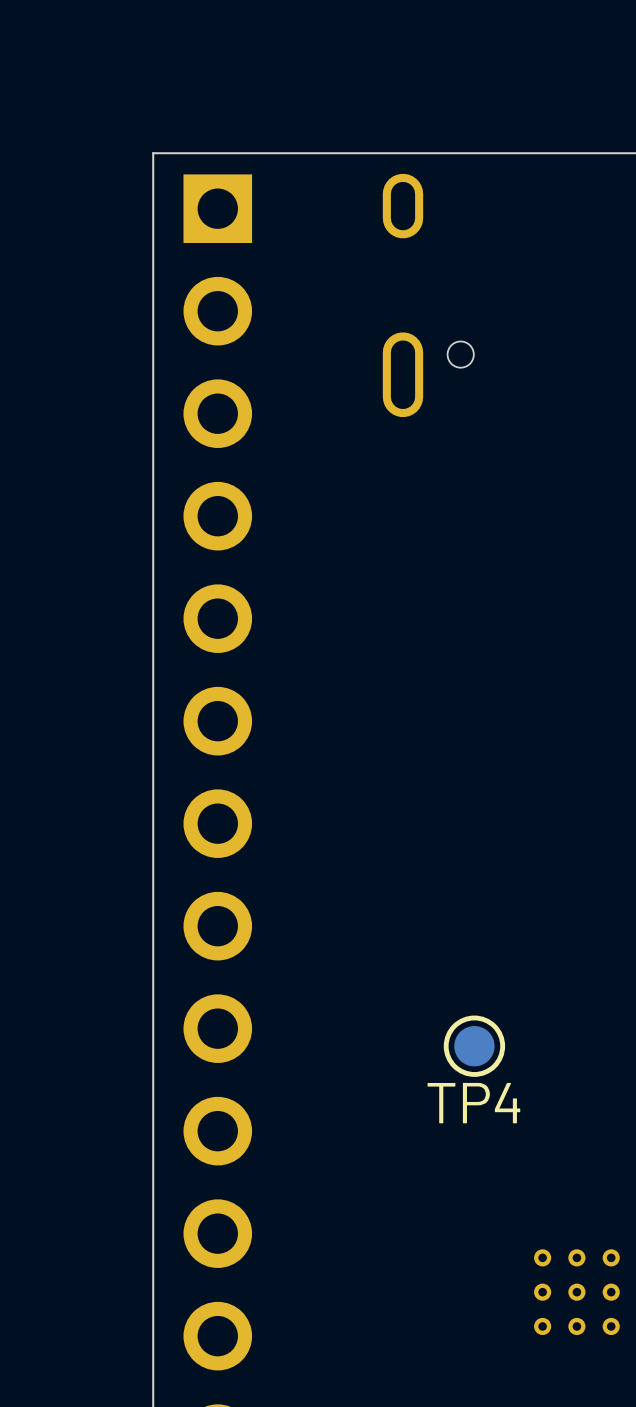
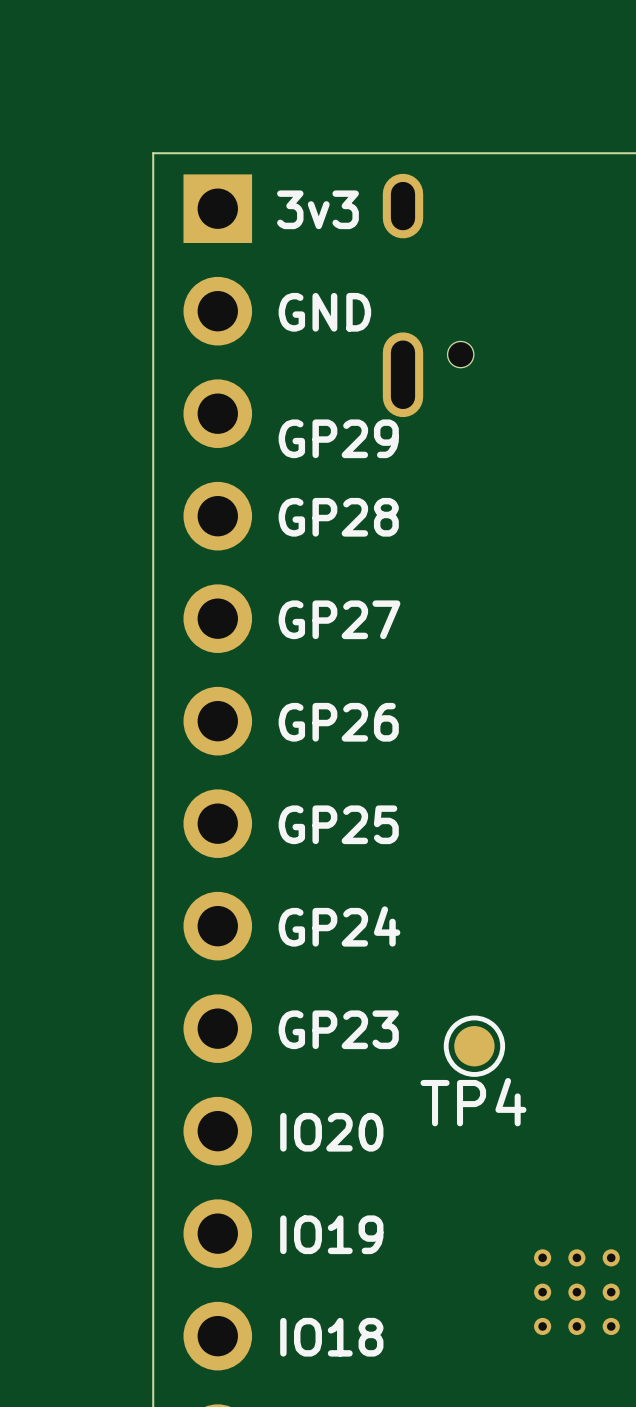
text: none -> 3v3 (317, 209)
text: none -> GND (324, 312)
text: none -> GP29 (338, 438)
text: none -> GP28 (338, 517)
text: none -> GP27 (339, 619)
text: none -> GP26 (338, 722)
text: none -> GP25 (338, 824)
text: none -> GP24 (339, 926)
text: none -> GP23 (338, 1029)
text: none -> IO20 (331, 1132)
text: none -> IO19 (331, 1234)
text: none -> IO18 (331, 1337)

